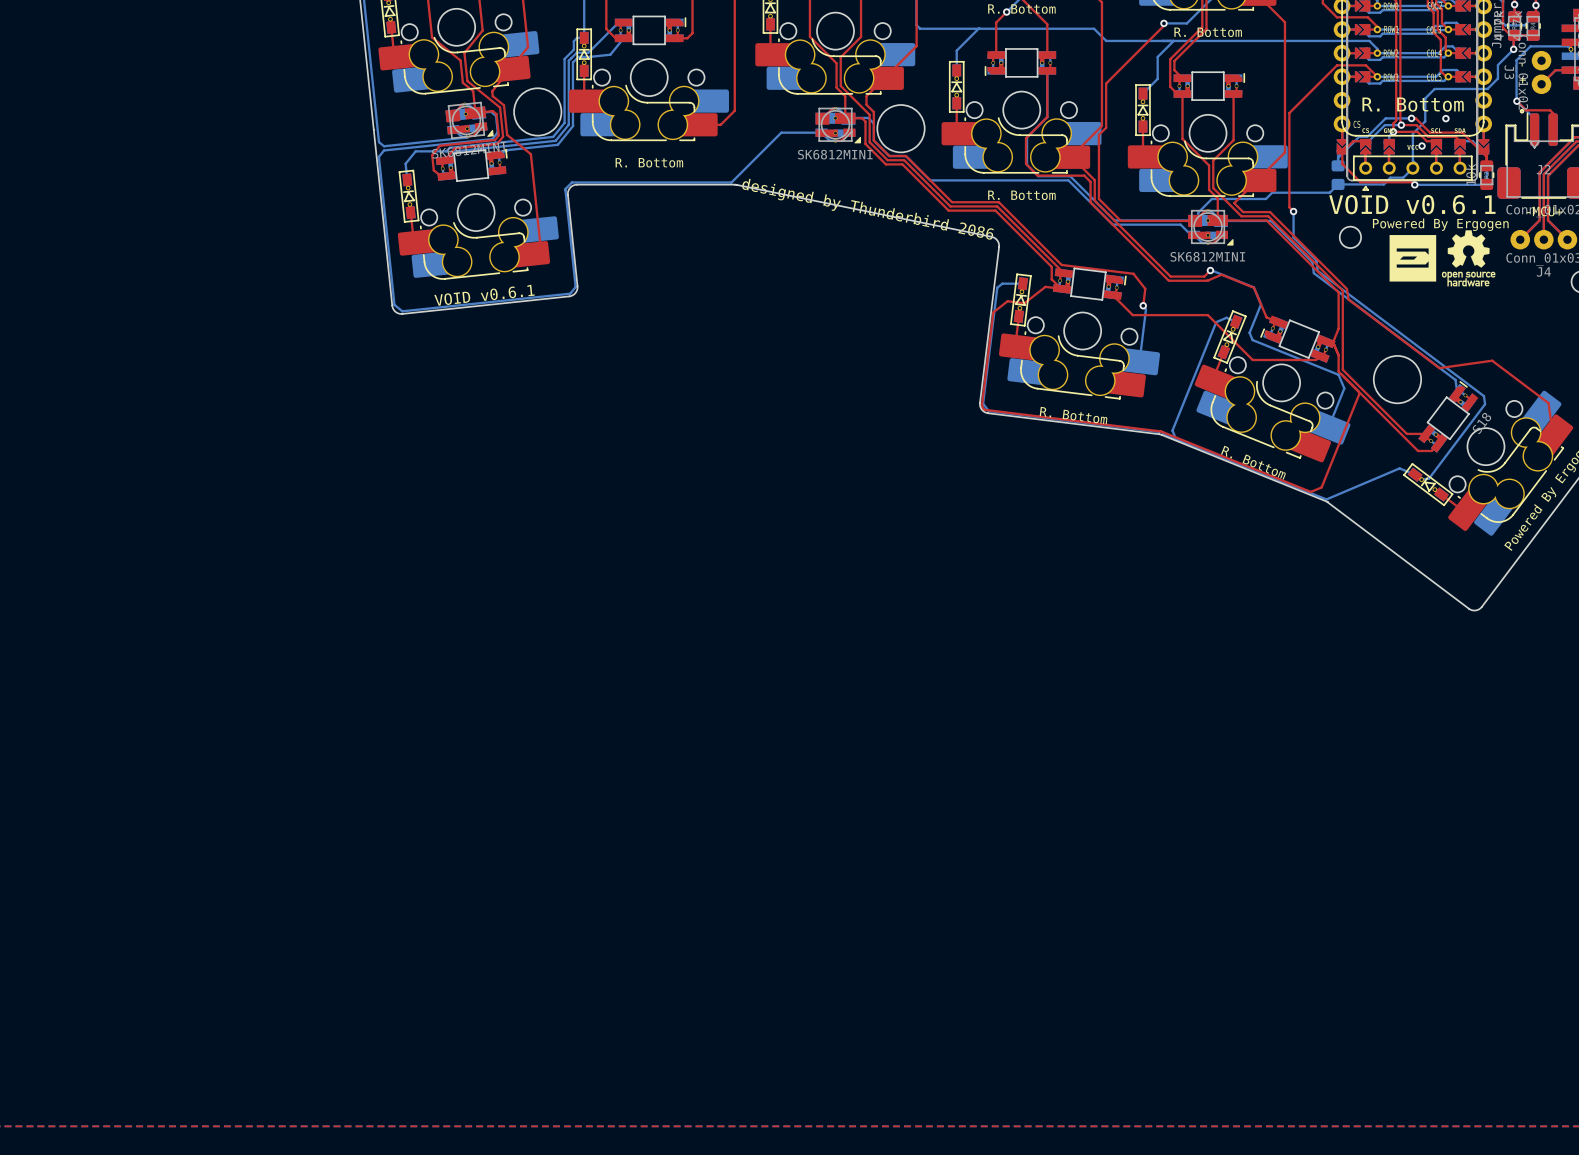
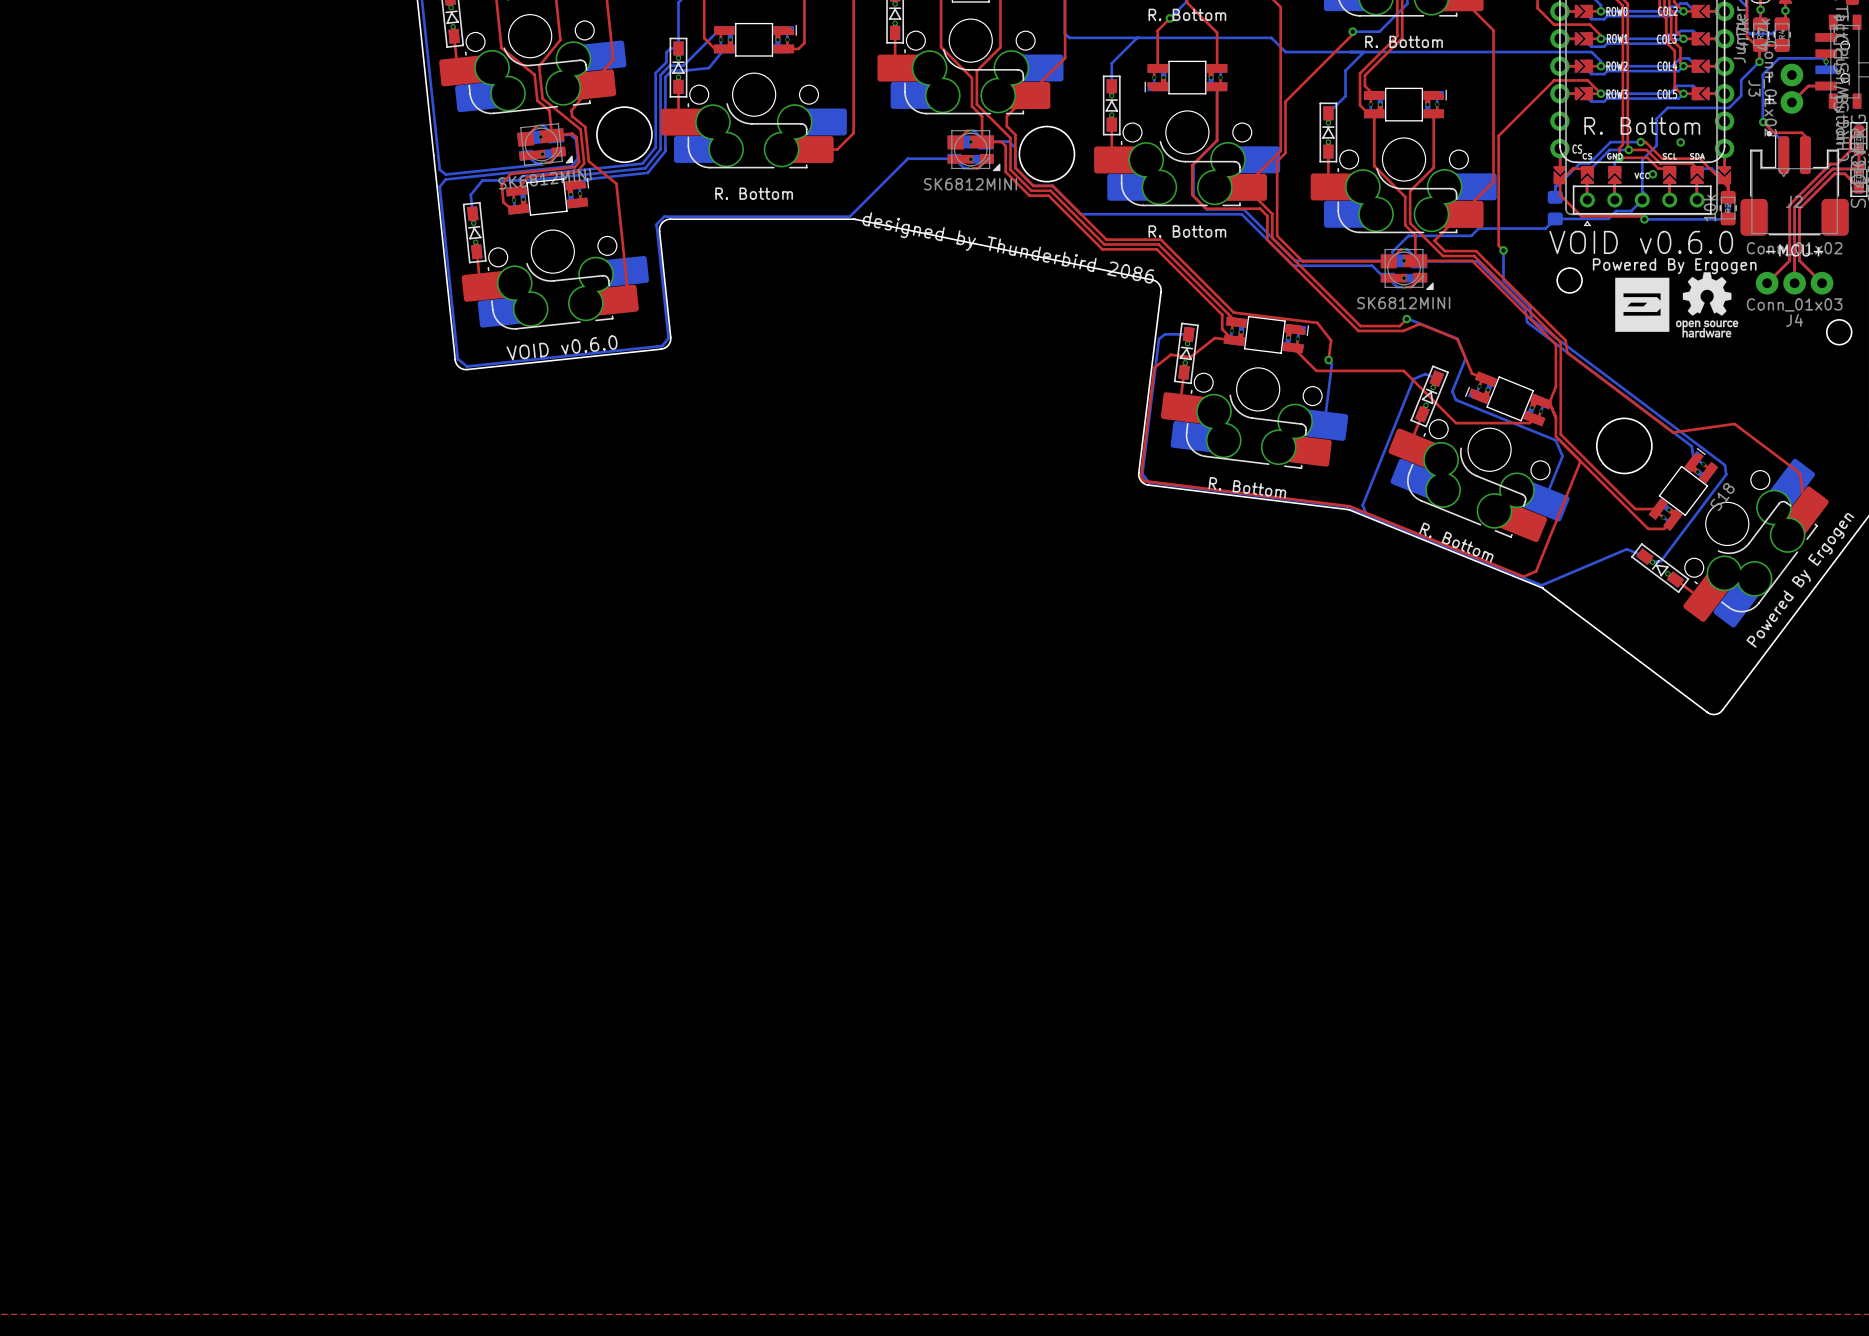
text: VOID v0.6.1 (1412, 204) -> VOID v0.6.0 (1641, 242)
text: VOID v0.6.1 (484, 295) -> VOID v0.6.0 (562, 347)

